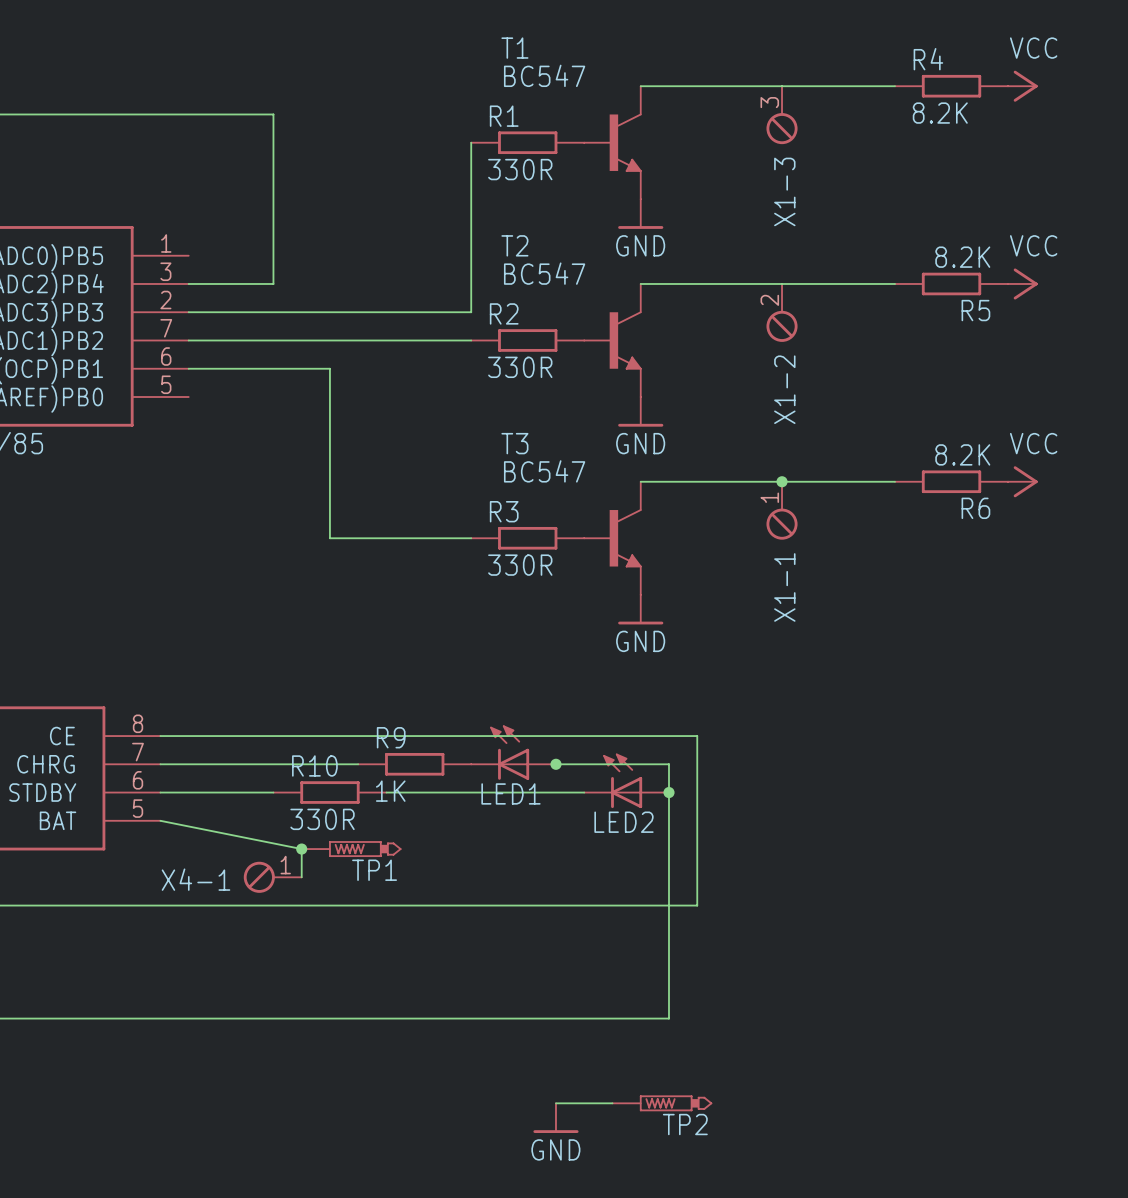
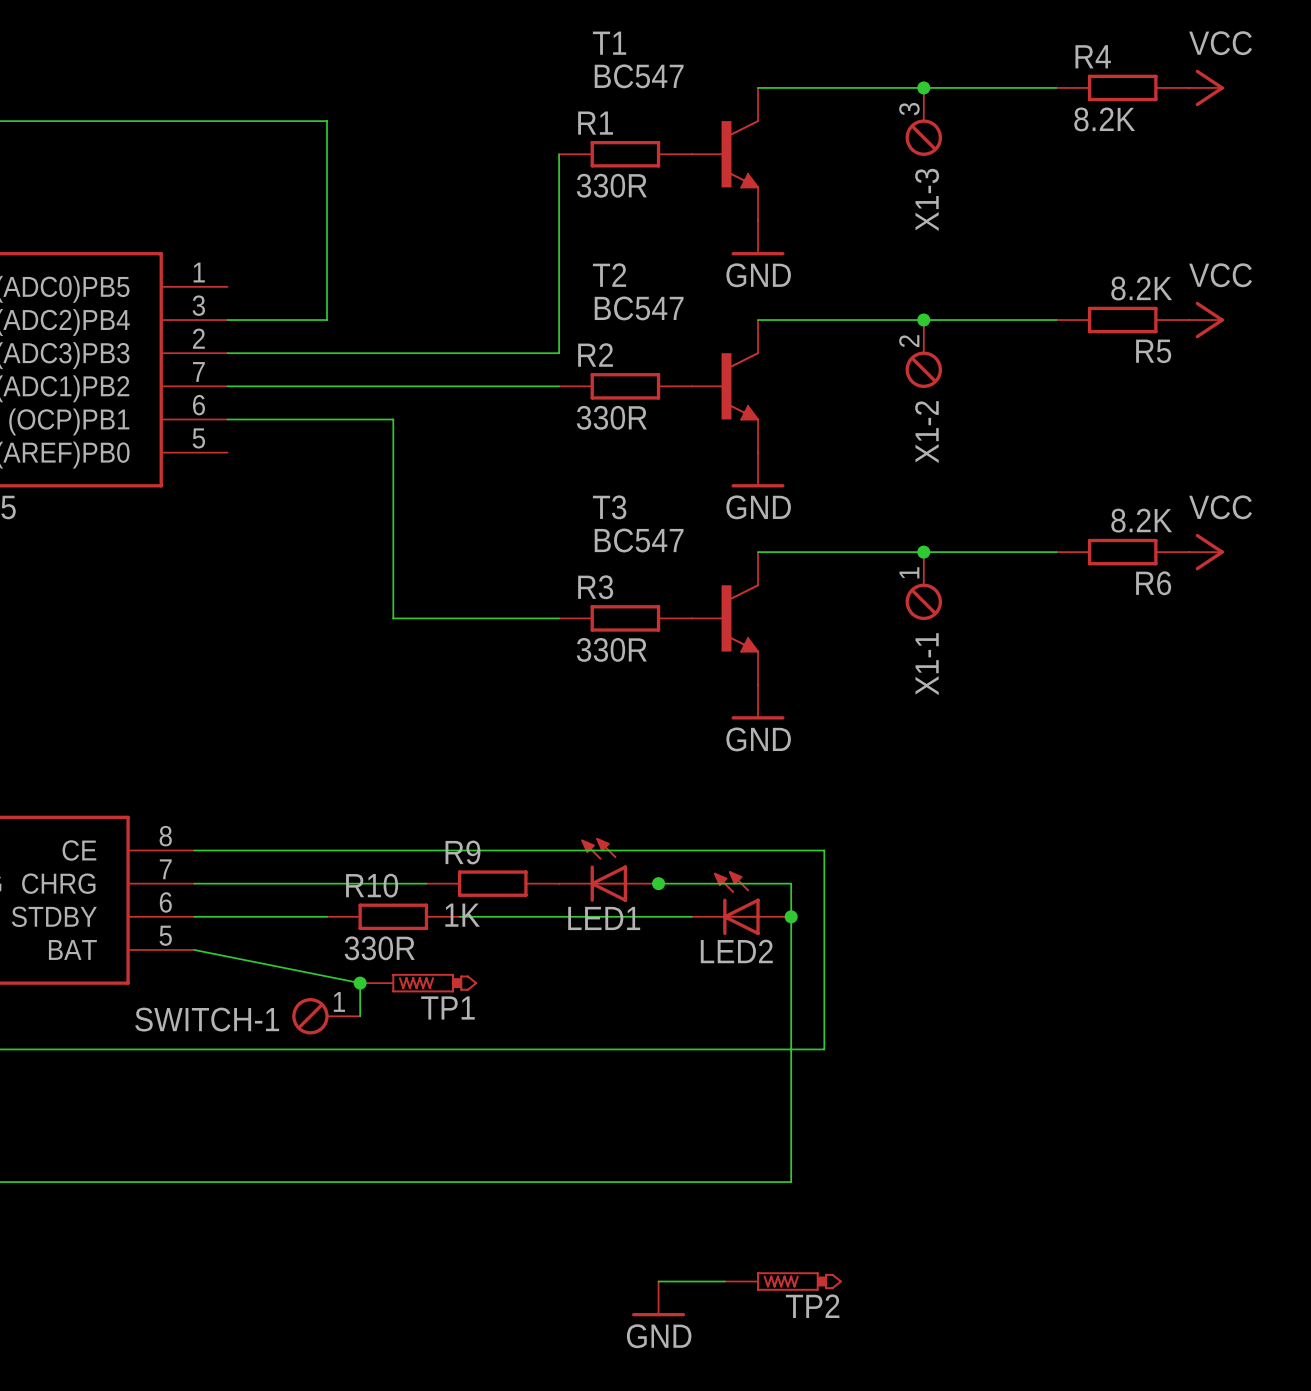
junction: none -> (923, 87)
junction: none -> (923, 320)
X4-1 name: X4-1 (195, 879) -> SWITCH-1 (207, 1019)

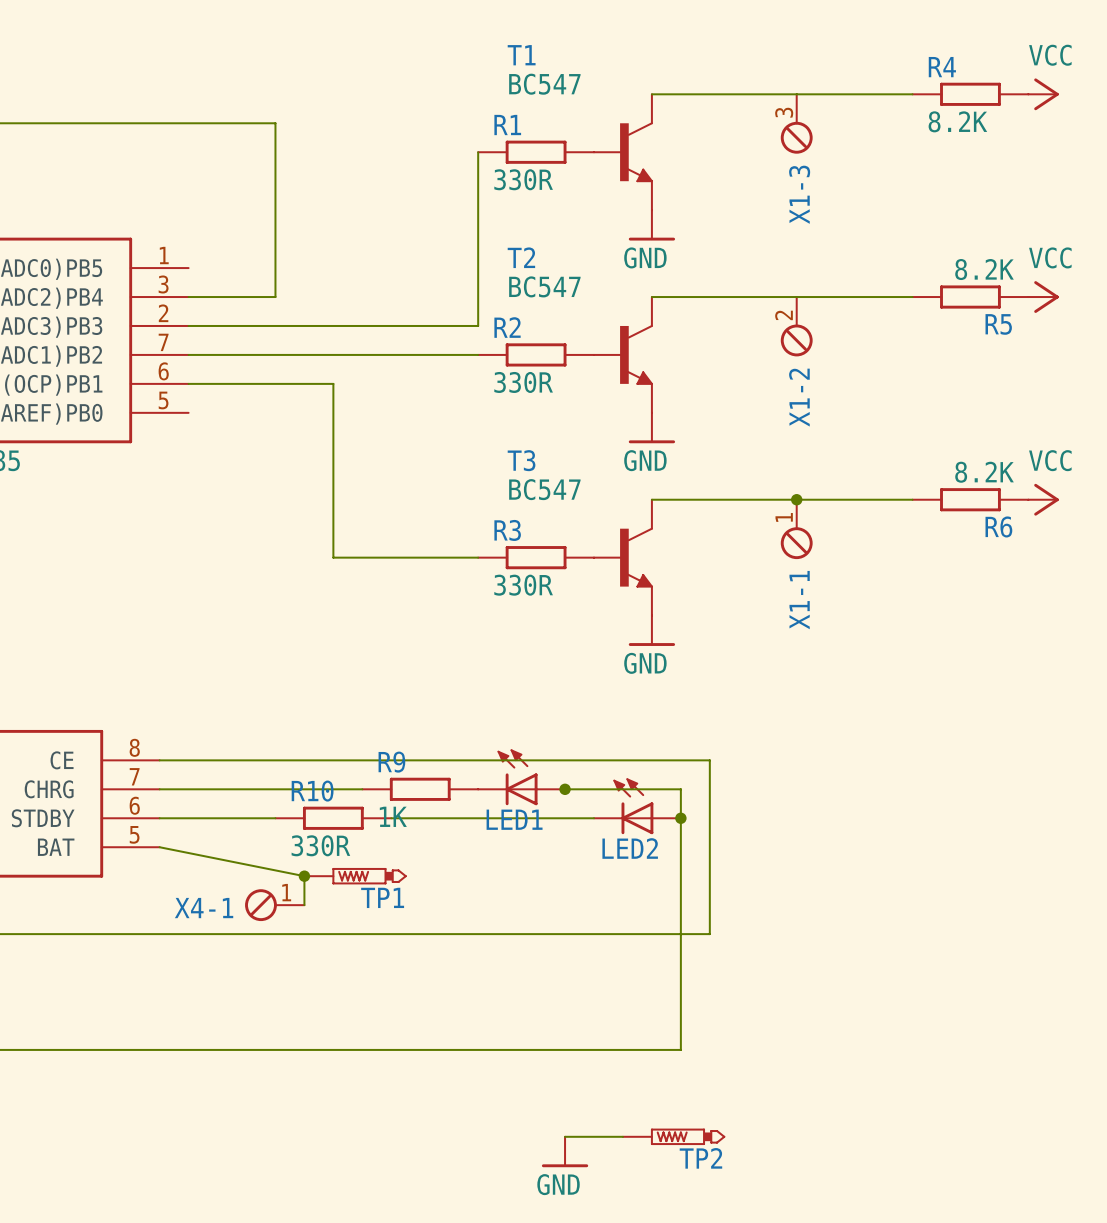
junction: (923, 87) -> none
junction: (923, 320) -> none
SWITCH-1 name: SWITCH-1 (207, 1019) -> X4-1 (204, 908)

